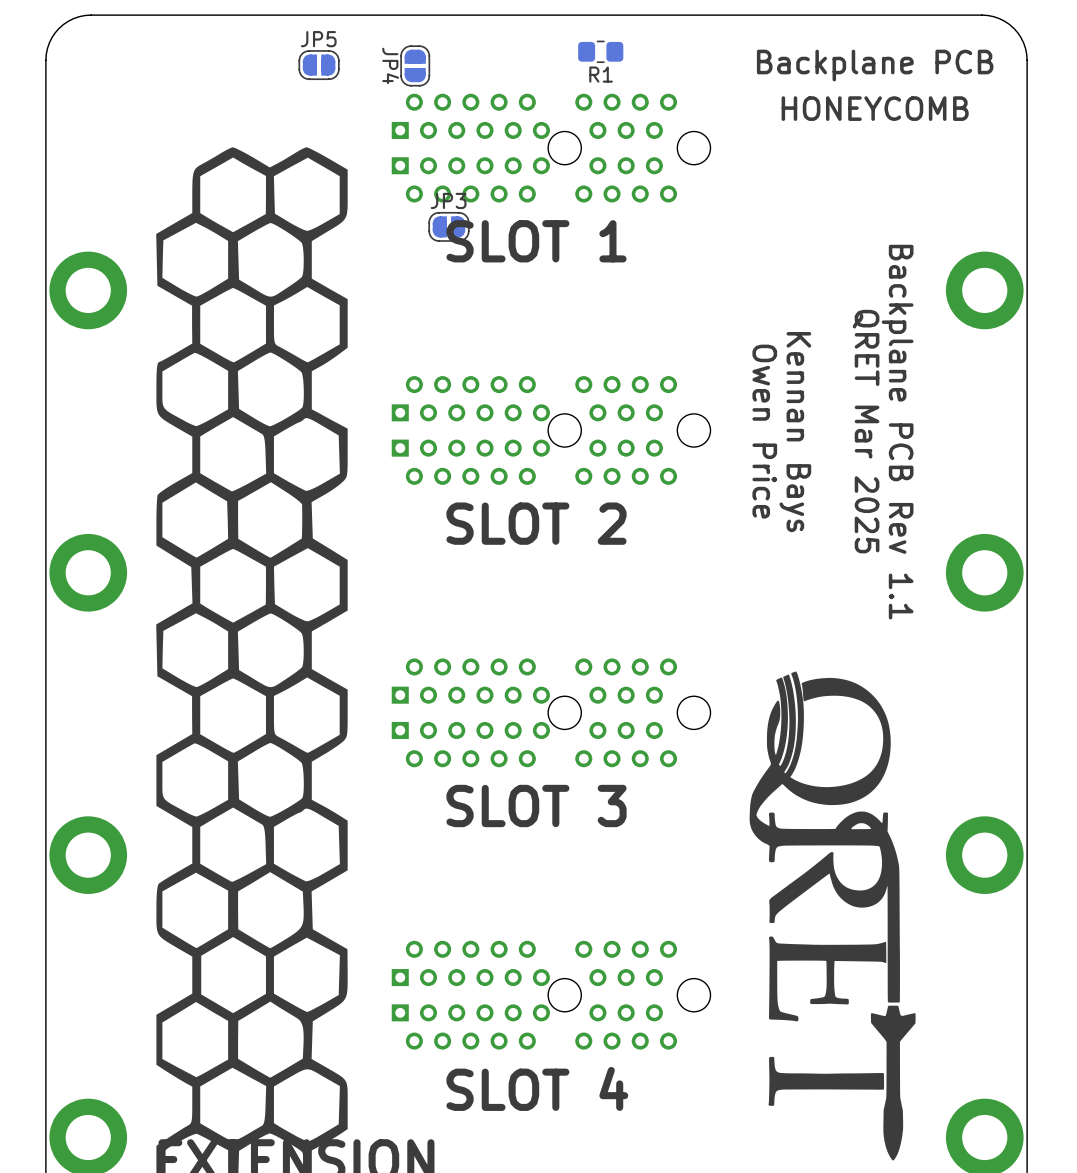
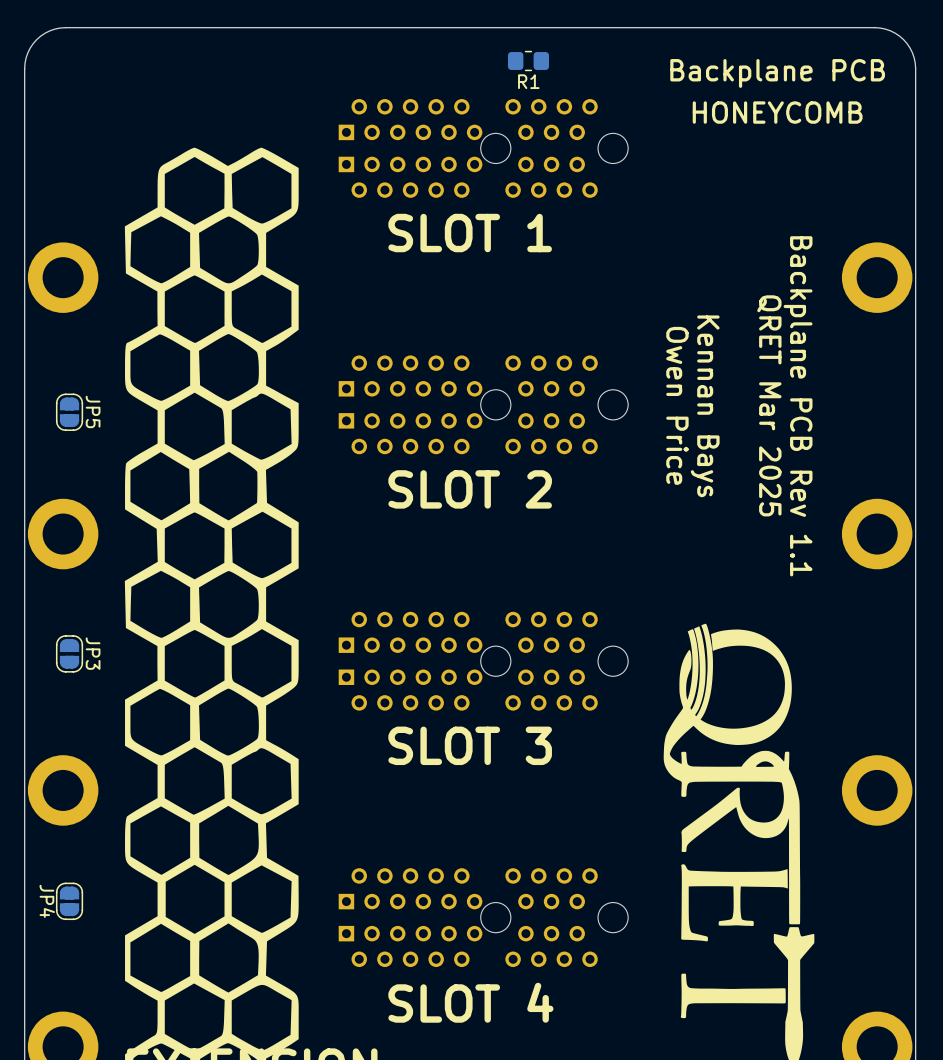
JP5 rotation: 0° (319, 65) -> 90° clockwise (69, 412)
JP5 position: (319, 65) -> (69, 412)
JP4 position: (415, 65) -> (69, 901)
JP3 rotation: 0° (448, 226) -> 90° clockwise (69, 653)
JP3 position: (448, 226) -> (69, 653)

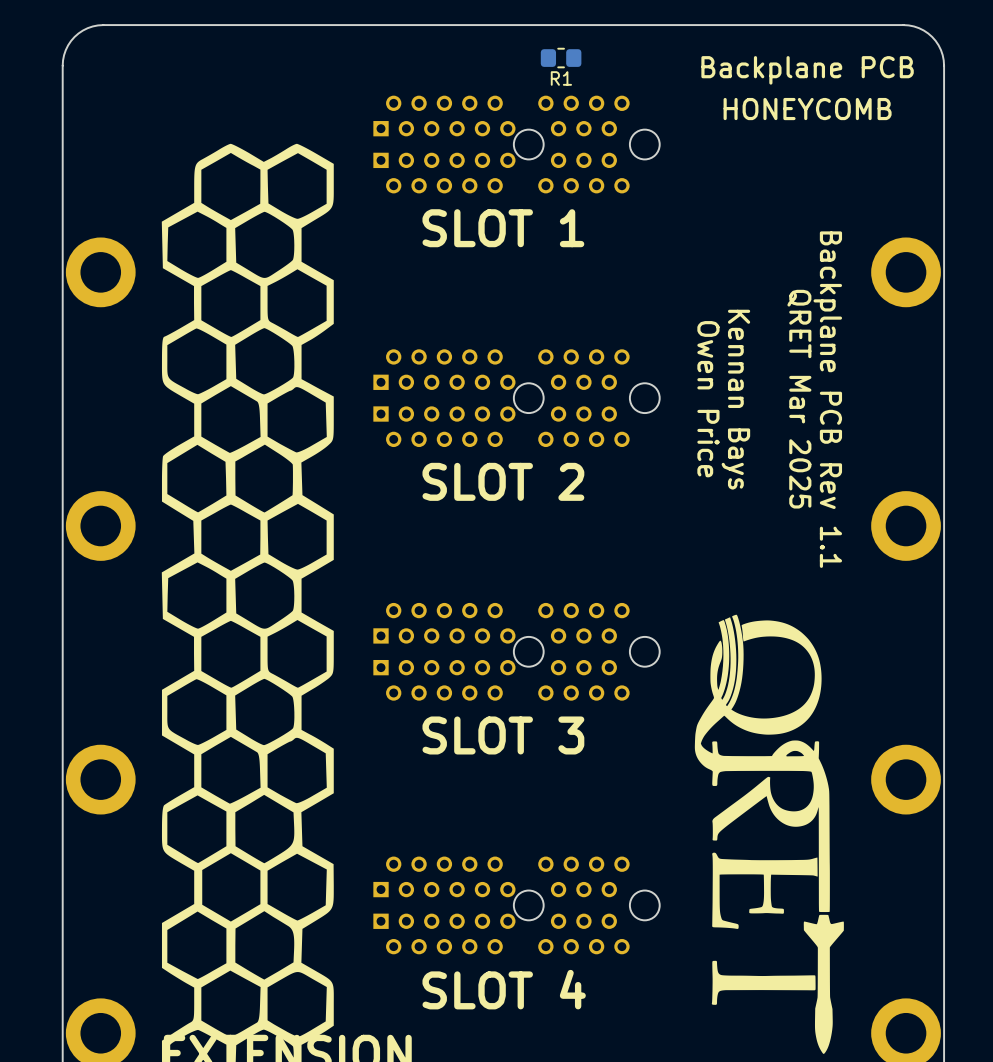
JP5: (69, 412) -> none
JP3: (69, 653) -> none
JP4: (69, 901) -> none

